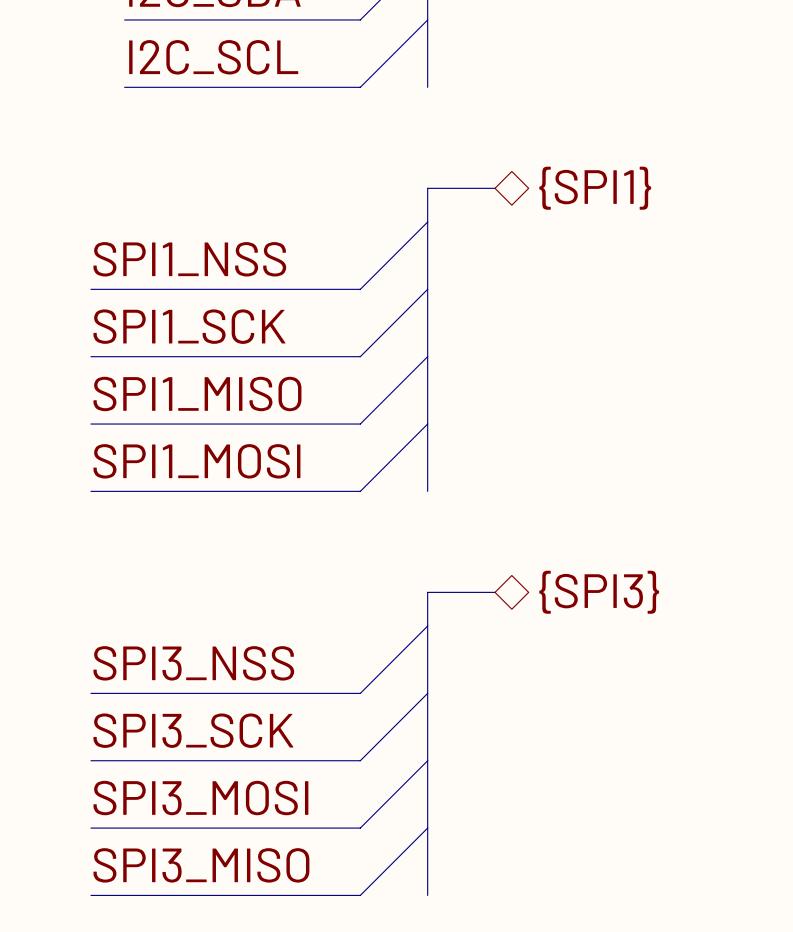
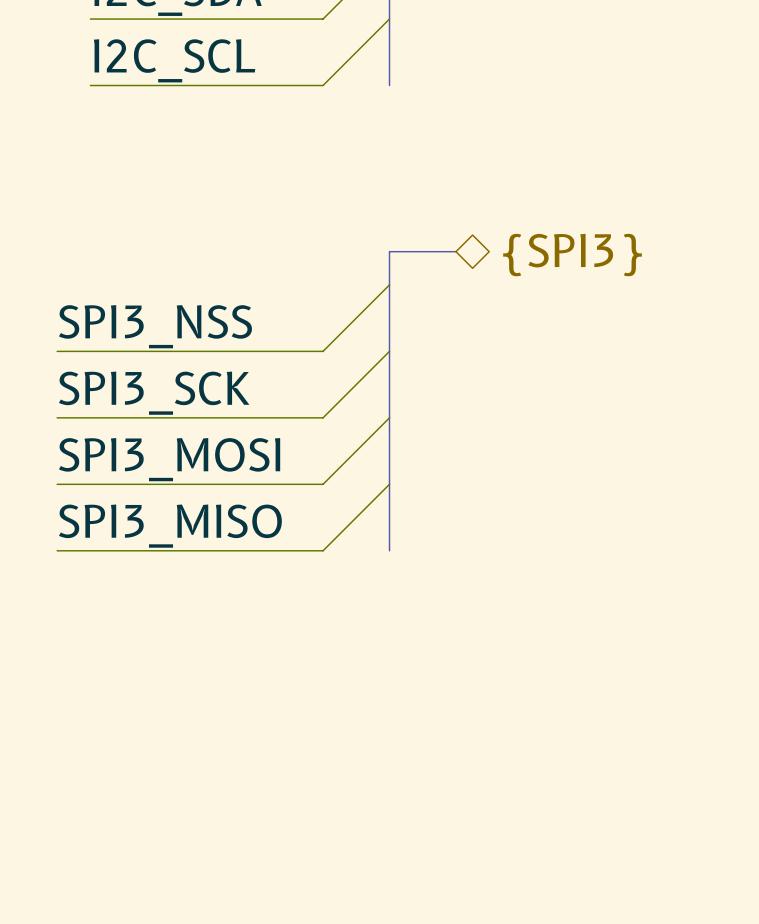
bus: (495, 188) (427, 188) (427, 255) -> (455, 251) (389, 251)
hierarchical label: {SPI1} (595, 188) -> none
wire: (427, 222) (360, 289) (90, 289) -> none
label: SPI1_NSS (189, 259) -> none
label: SPI1_SCK (189, 326) -> SPI3_NSS (155, 326)
label: SPI1_MISO (197, 393) -> SPI3_SCK (154, 393)
label: SPI1_MOSI (196, 461) -> SPI3_MOSI (169, 459)
bus: none -> (389, 484) (389, 550)
bus: (495, 592) (427, 592) (427, 895) -> none
hierarchical label position: {SPI3} (599, 592) -> {SPI3} (572, 255)
wire: (427, 626) (360, 693) (90, 693) -> (389, 484) (323, 550) (57, 550)
label: SPI3_NSS (193, 663) -> none
wire: (427, 693) (360, 760) (90, 760) -> none
label: SPI3_SCK (193, 730) -> none
wire: (427, 760) (360, 828) (90, 828) -> none
label: SPI3_MOSI (200, 798) -> none
wire: (427, 828) (360, 895) (90, 895) -> none
label position: SPI3_MISO (201, 865) -> SPI3_MISO (170, 526)

